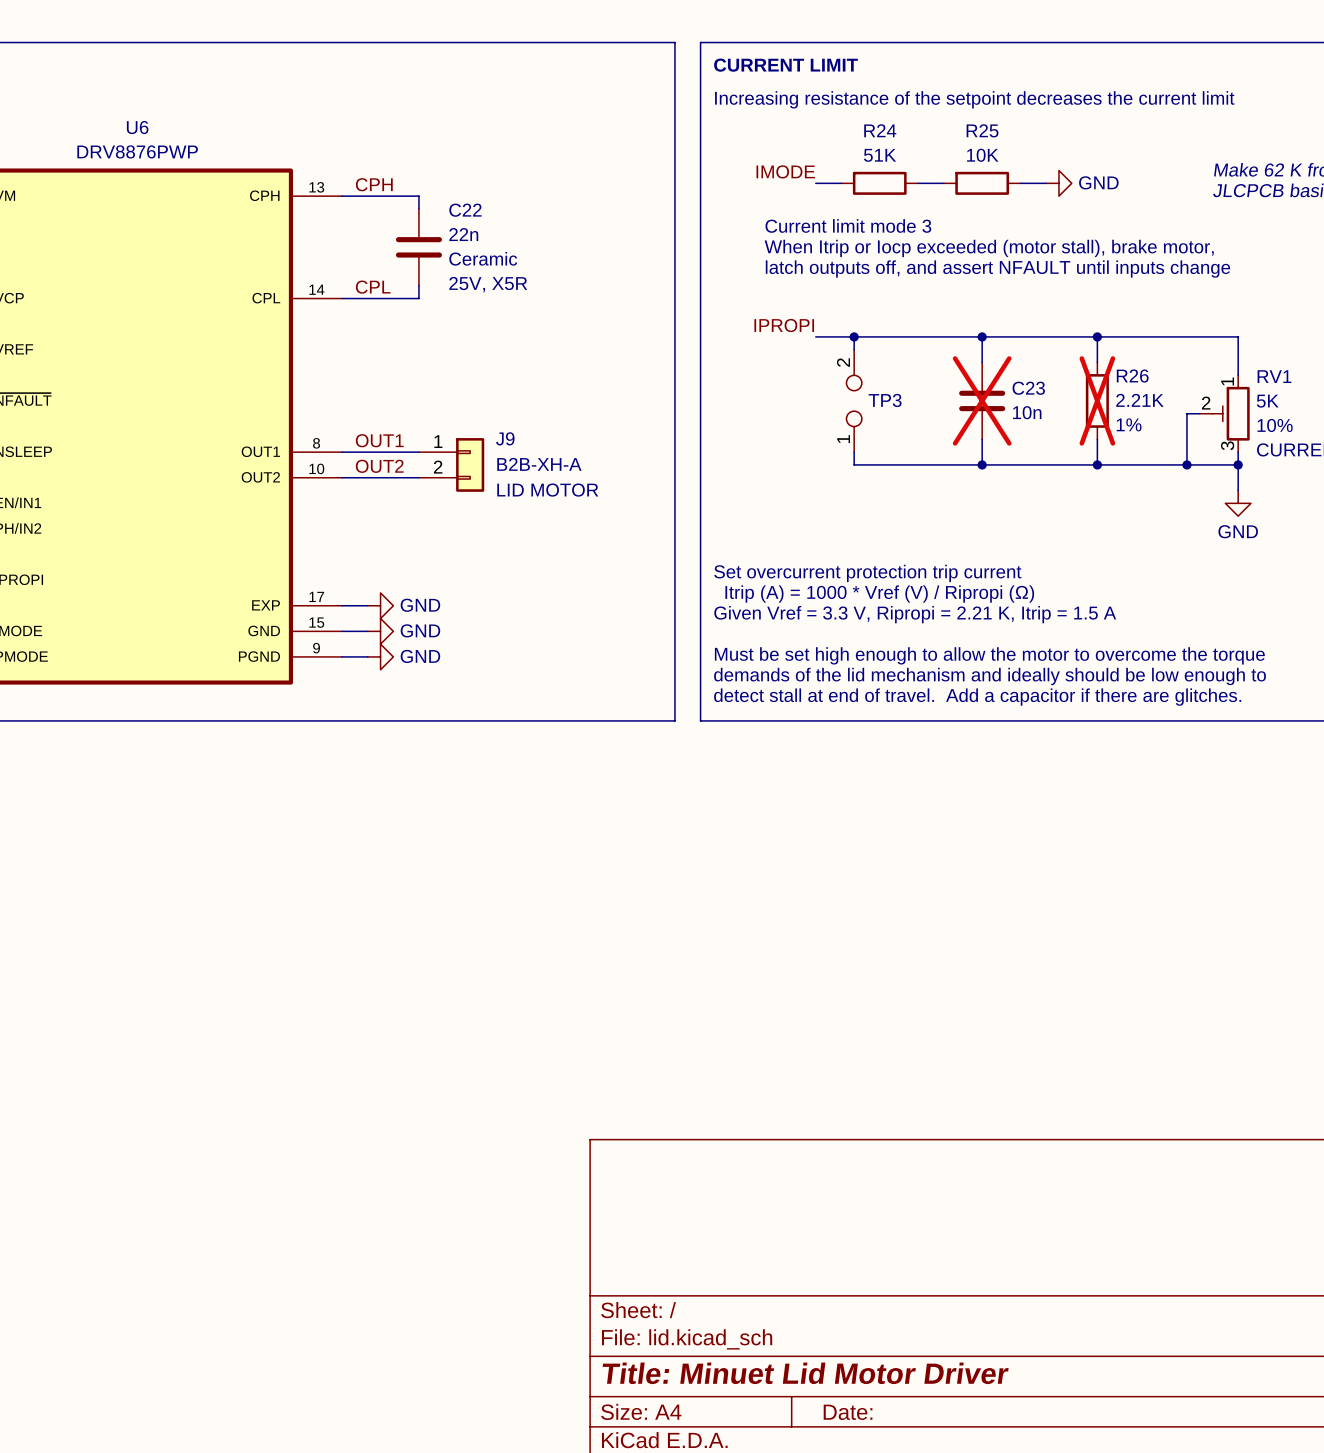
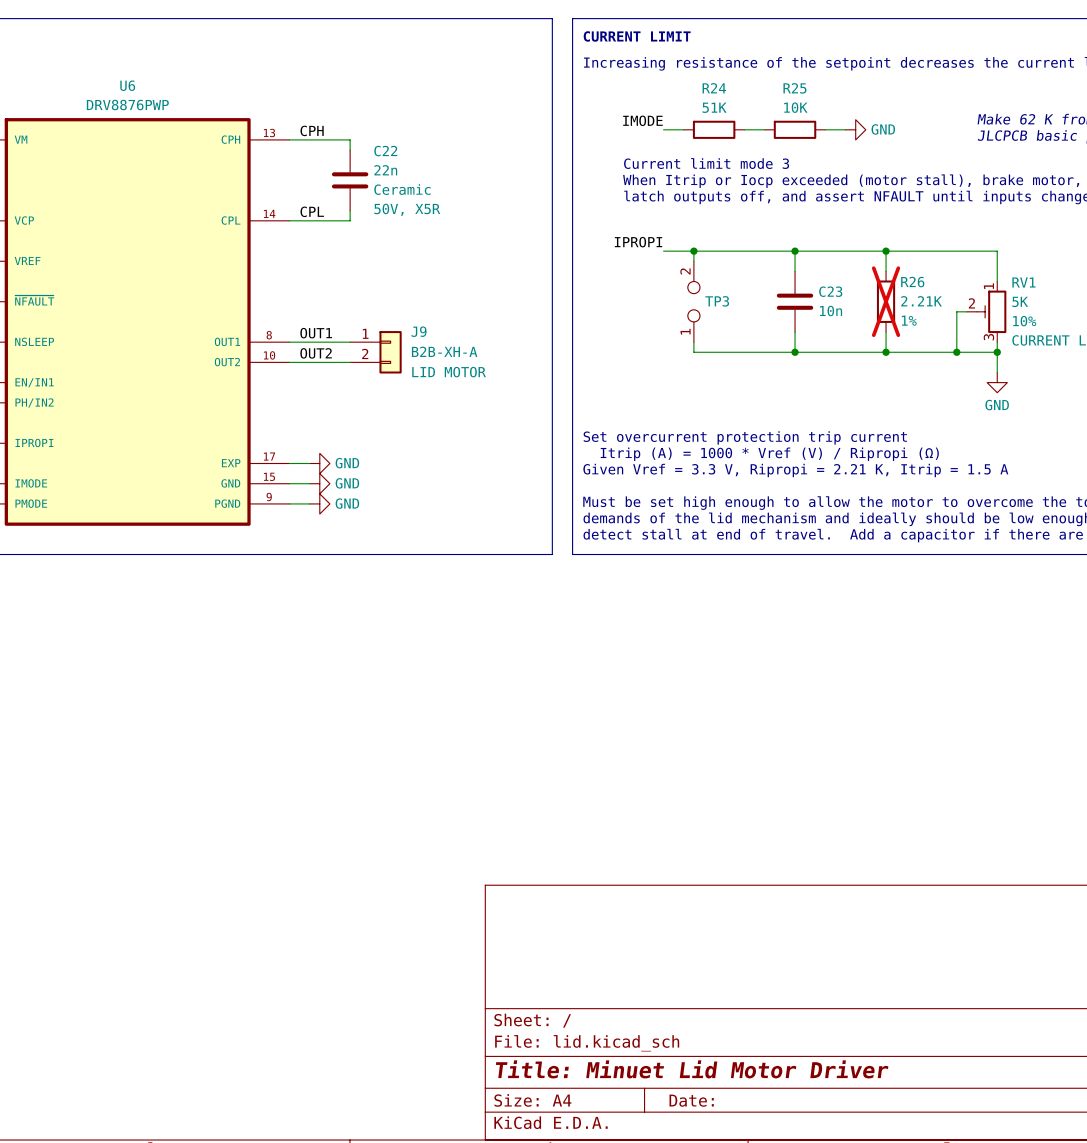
C22 text: 25V, X5R (488, 284) -> 50V, X5R (407, 209)
C23 do-not-place cross: (982, 400) -> none

